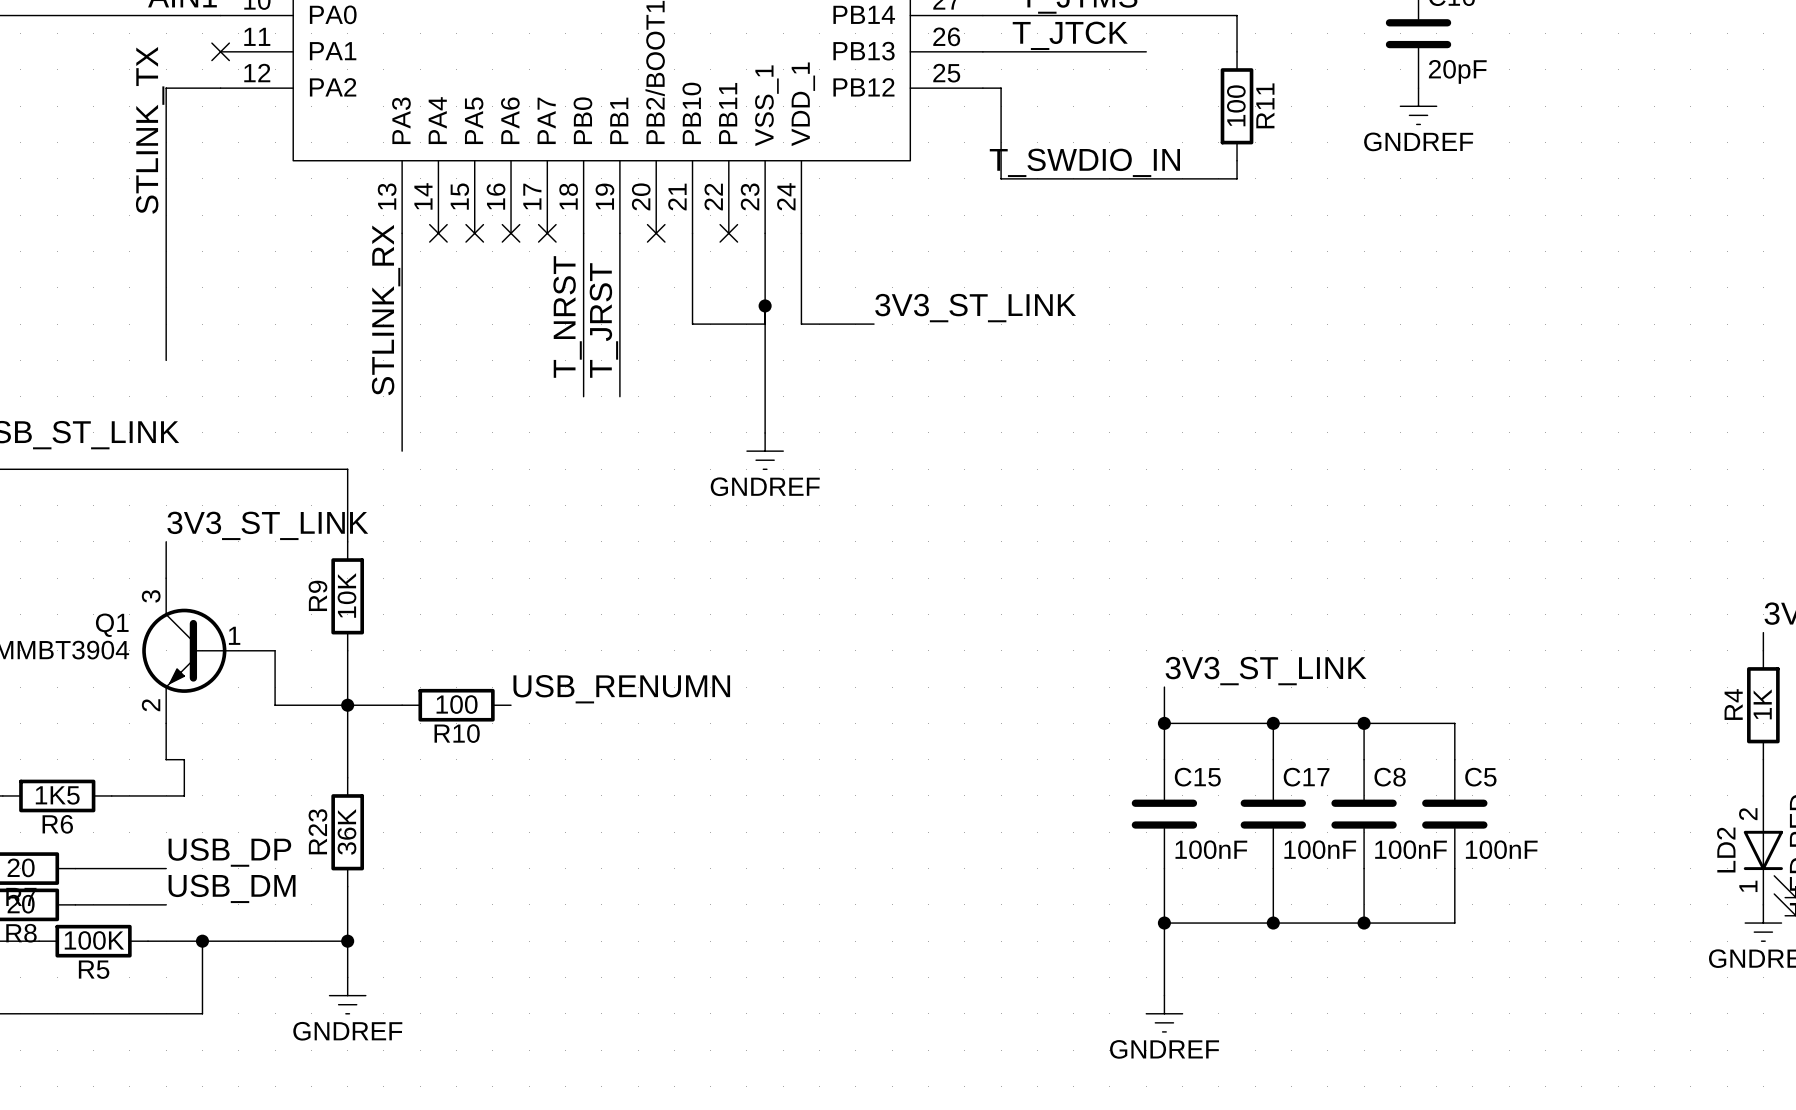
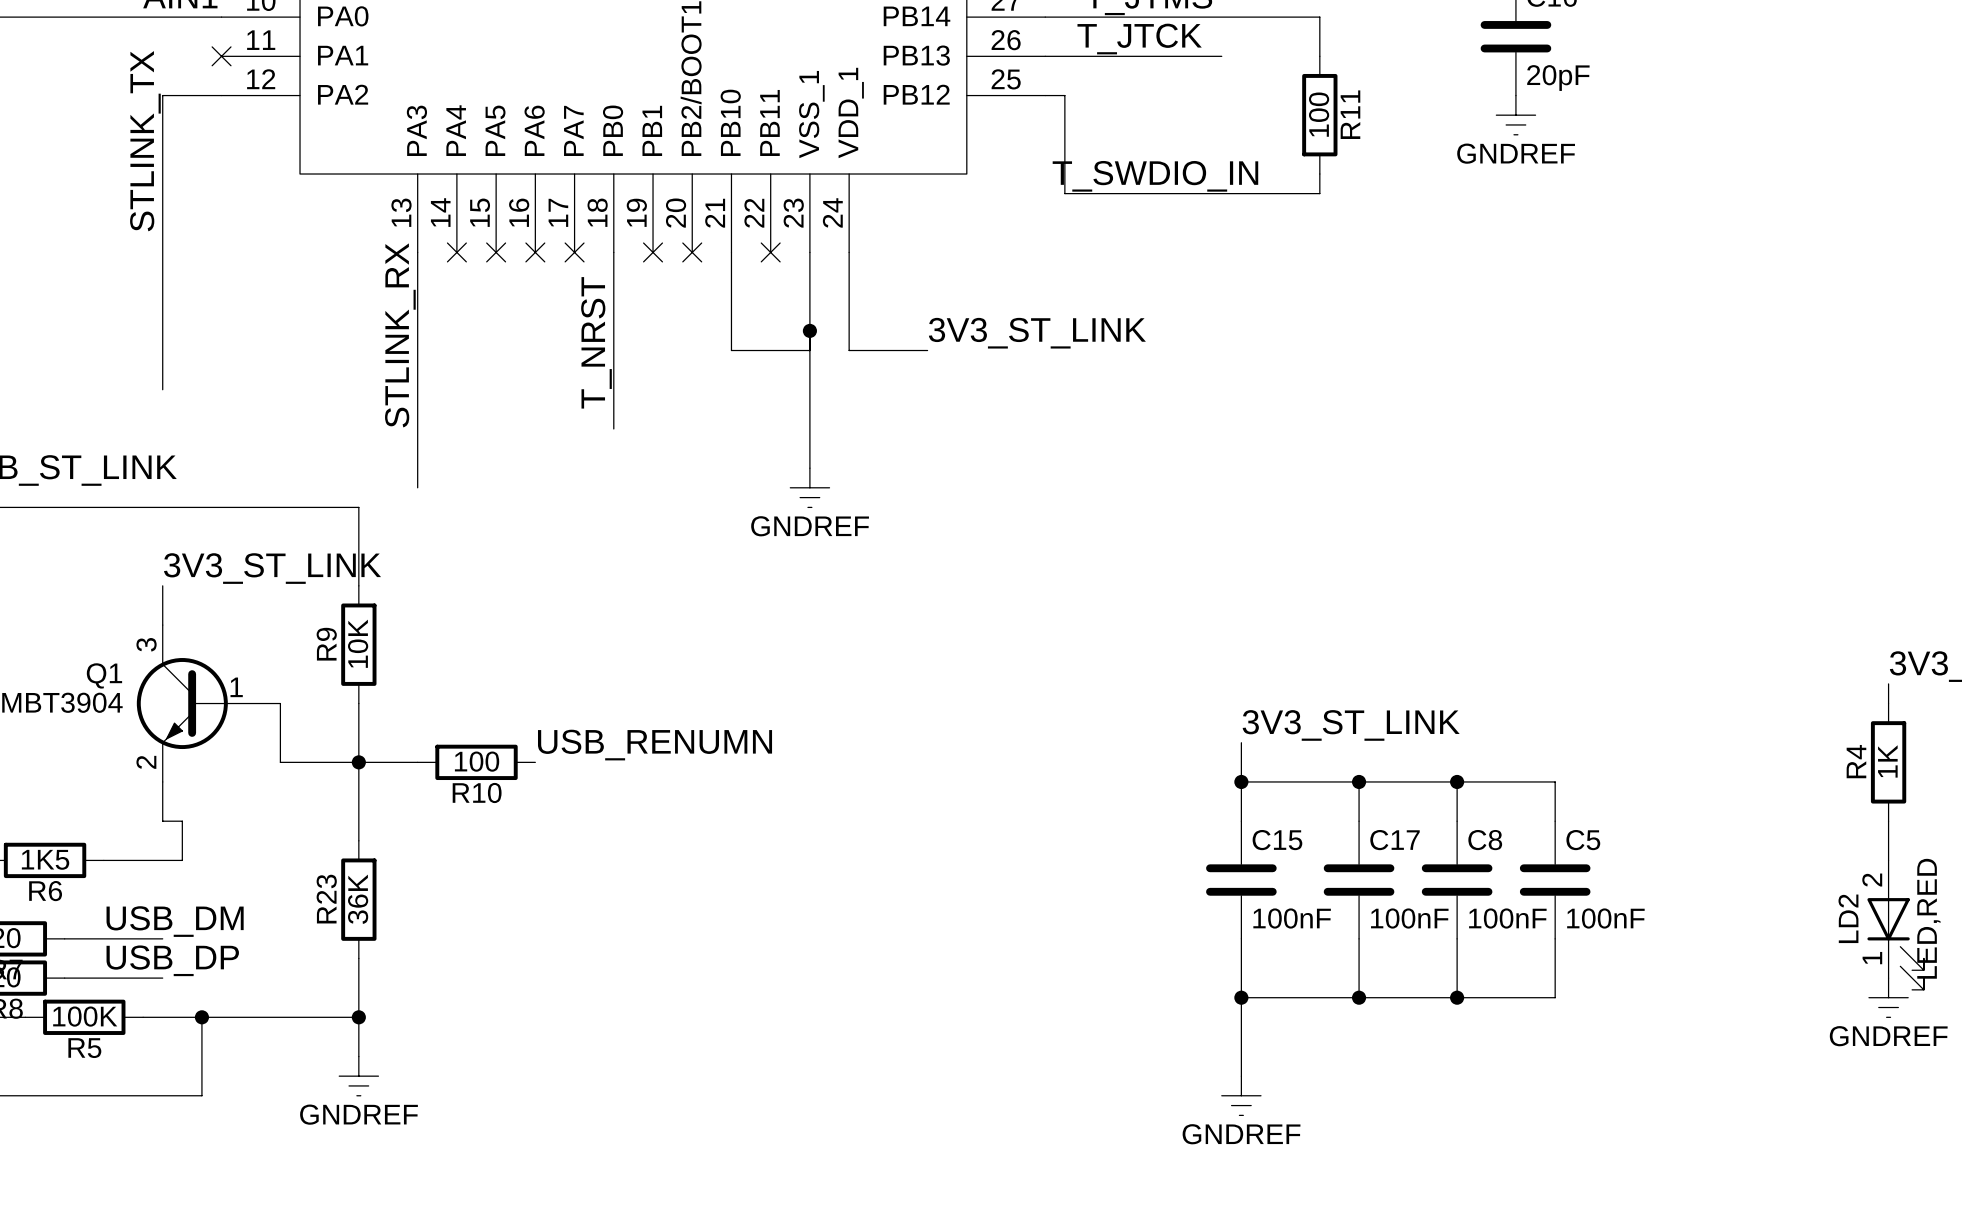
wire: (619, 233) (619, 396) -> none
no-connect mark: none -> (653, 252)
label: T_JRST (603, 320) -> none
label position: USB_DP (229, 852) -> USB_DP (172, 960)
label position: USB_DM (232, 888) -> USB_DM (175, 921)

